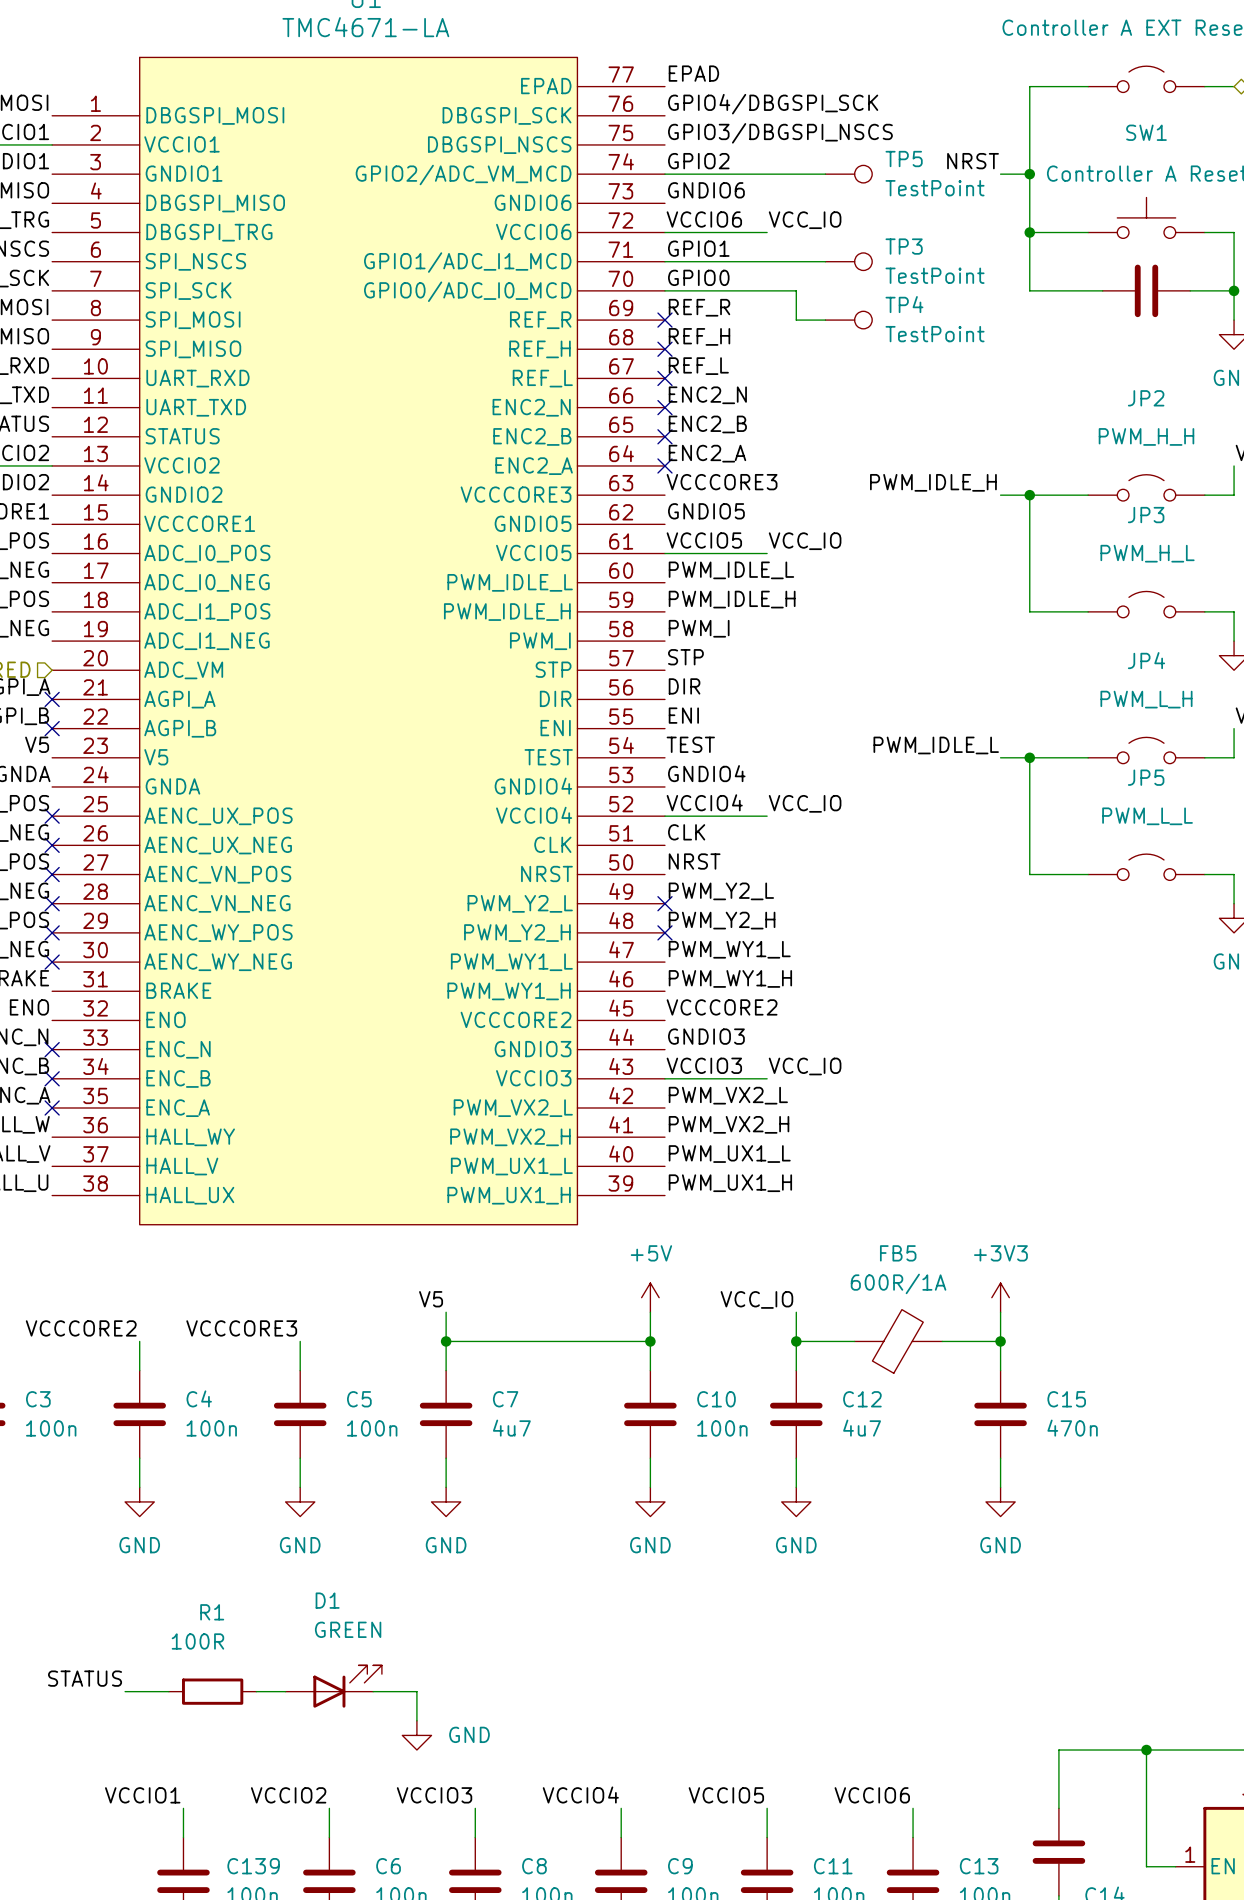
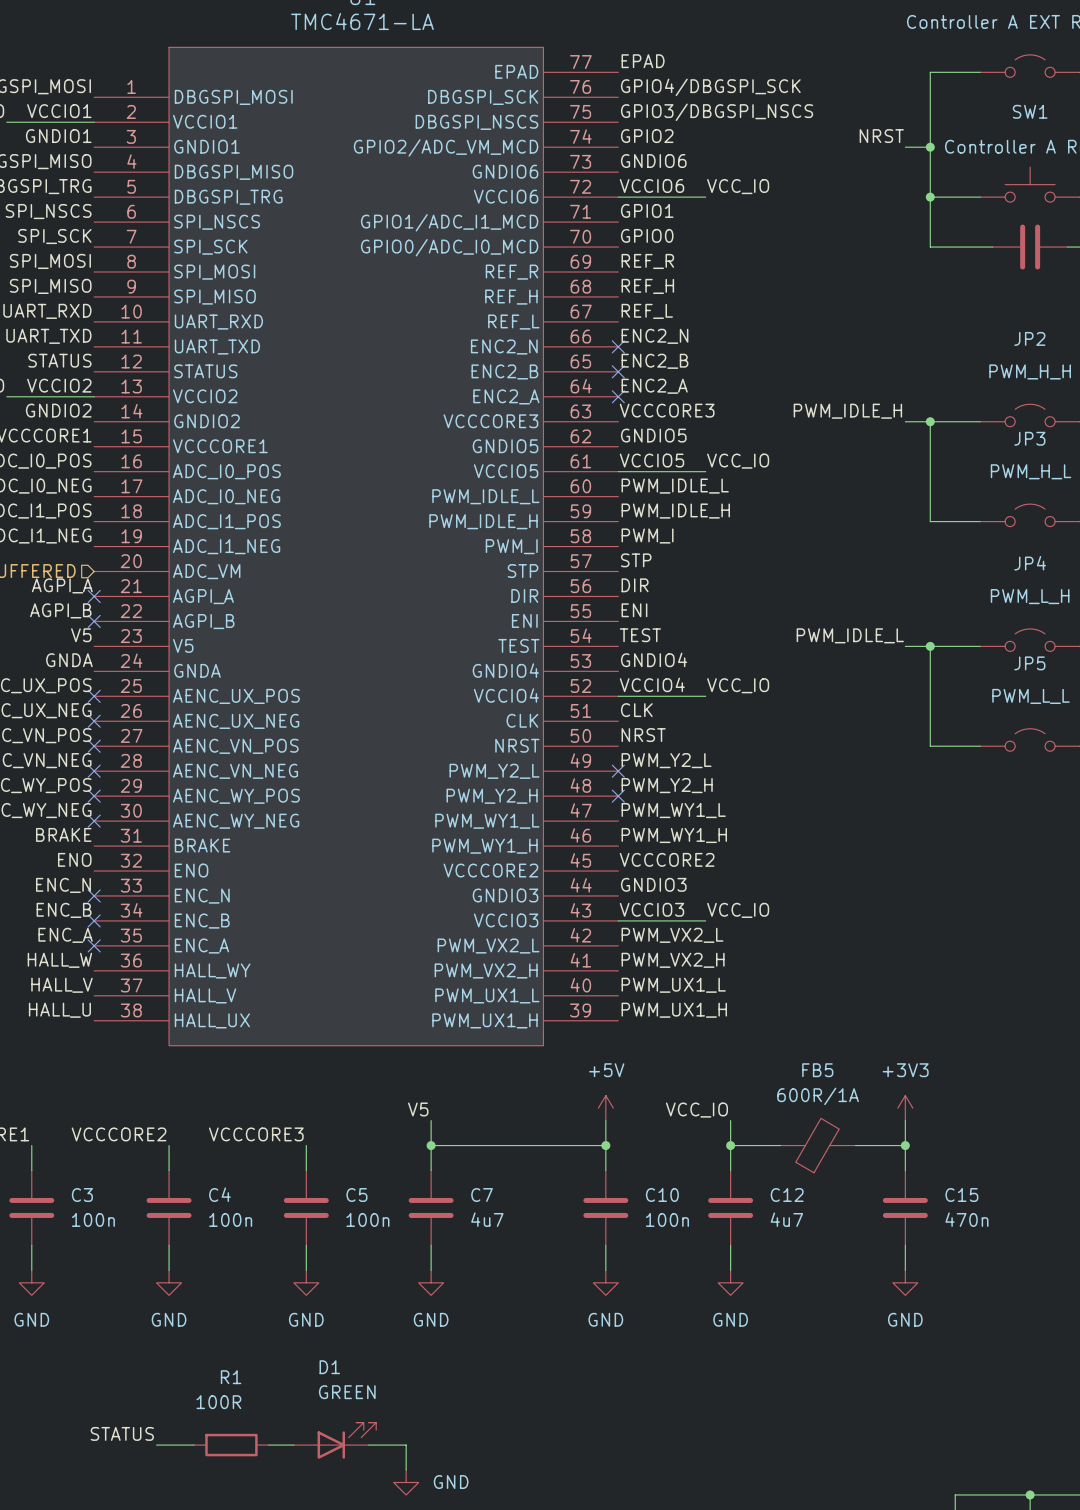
wire: (664, 174) (825, 174) -> none
TP5: TestPoint (848, 174) -> none
wire: (664, 261) (825, 261) -> none
TP3: TestPoint (848, 261) -> none
wire: (664, 290) (796, 290) (796, 320) (825, 320) -> none
no-connect mark: (664, 320) -> none
TP4: TestPoint (848, 320) -> none
no-connect mark: (664, 349) -> none
no-connect mark: (664, 378) -> none

